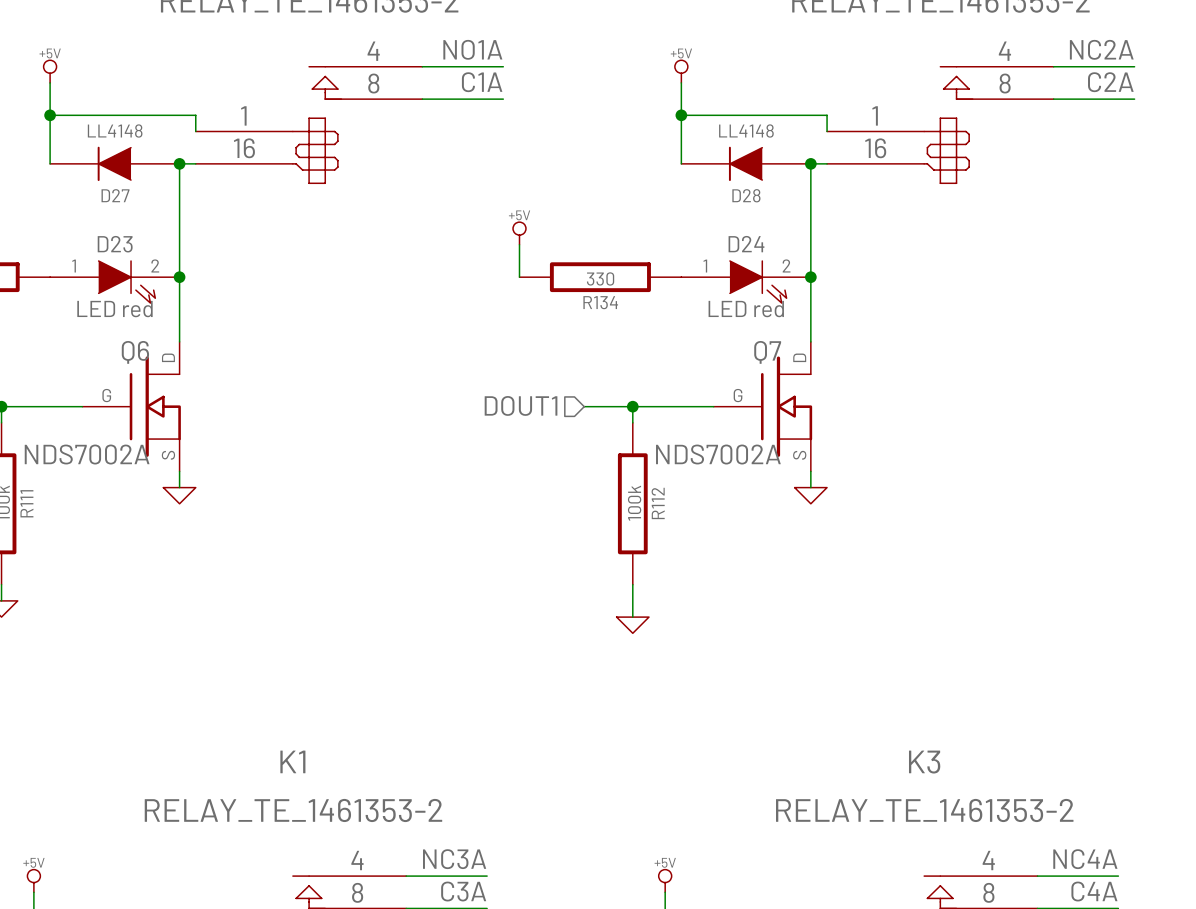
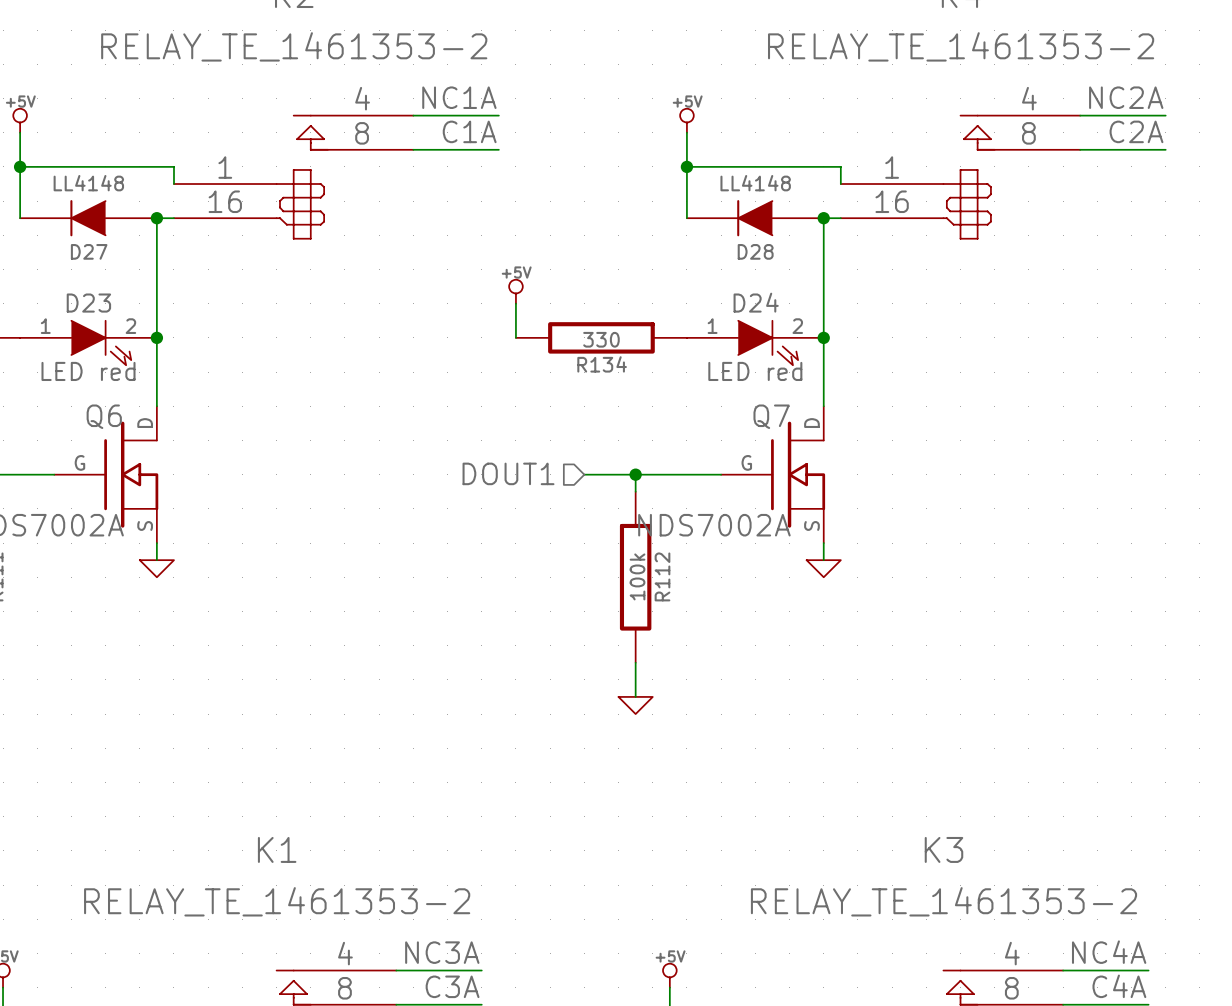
label: NO1A (472, 49) -> NC1A (459, 97)

